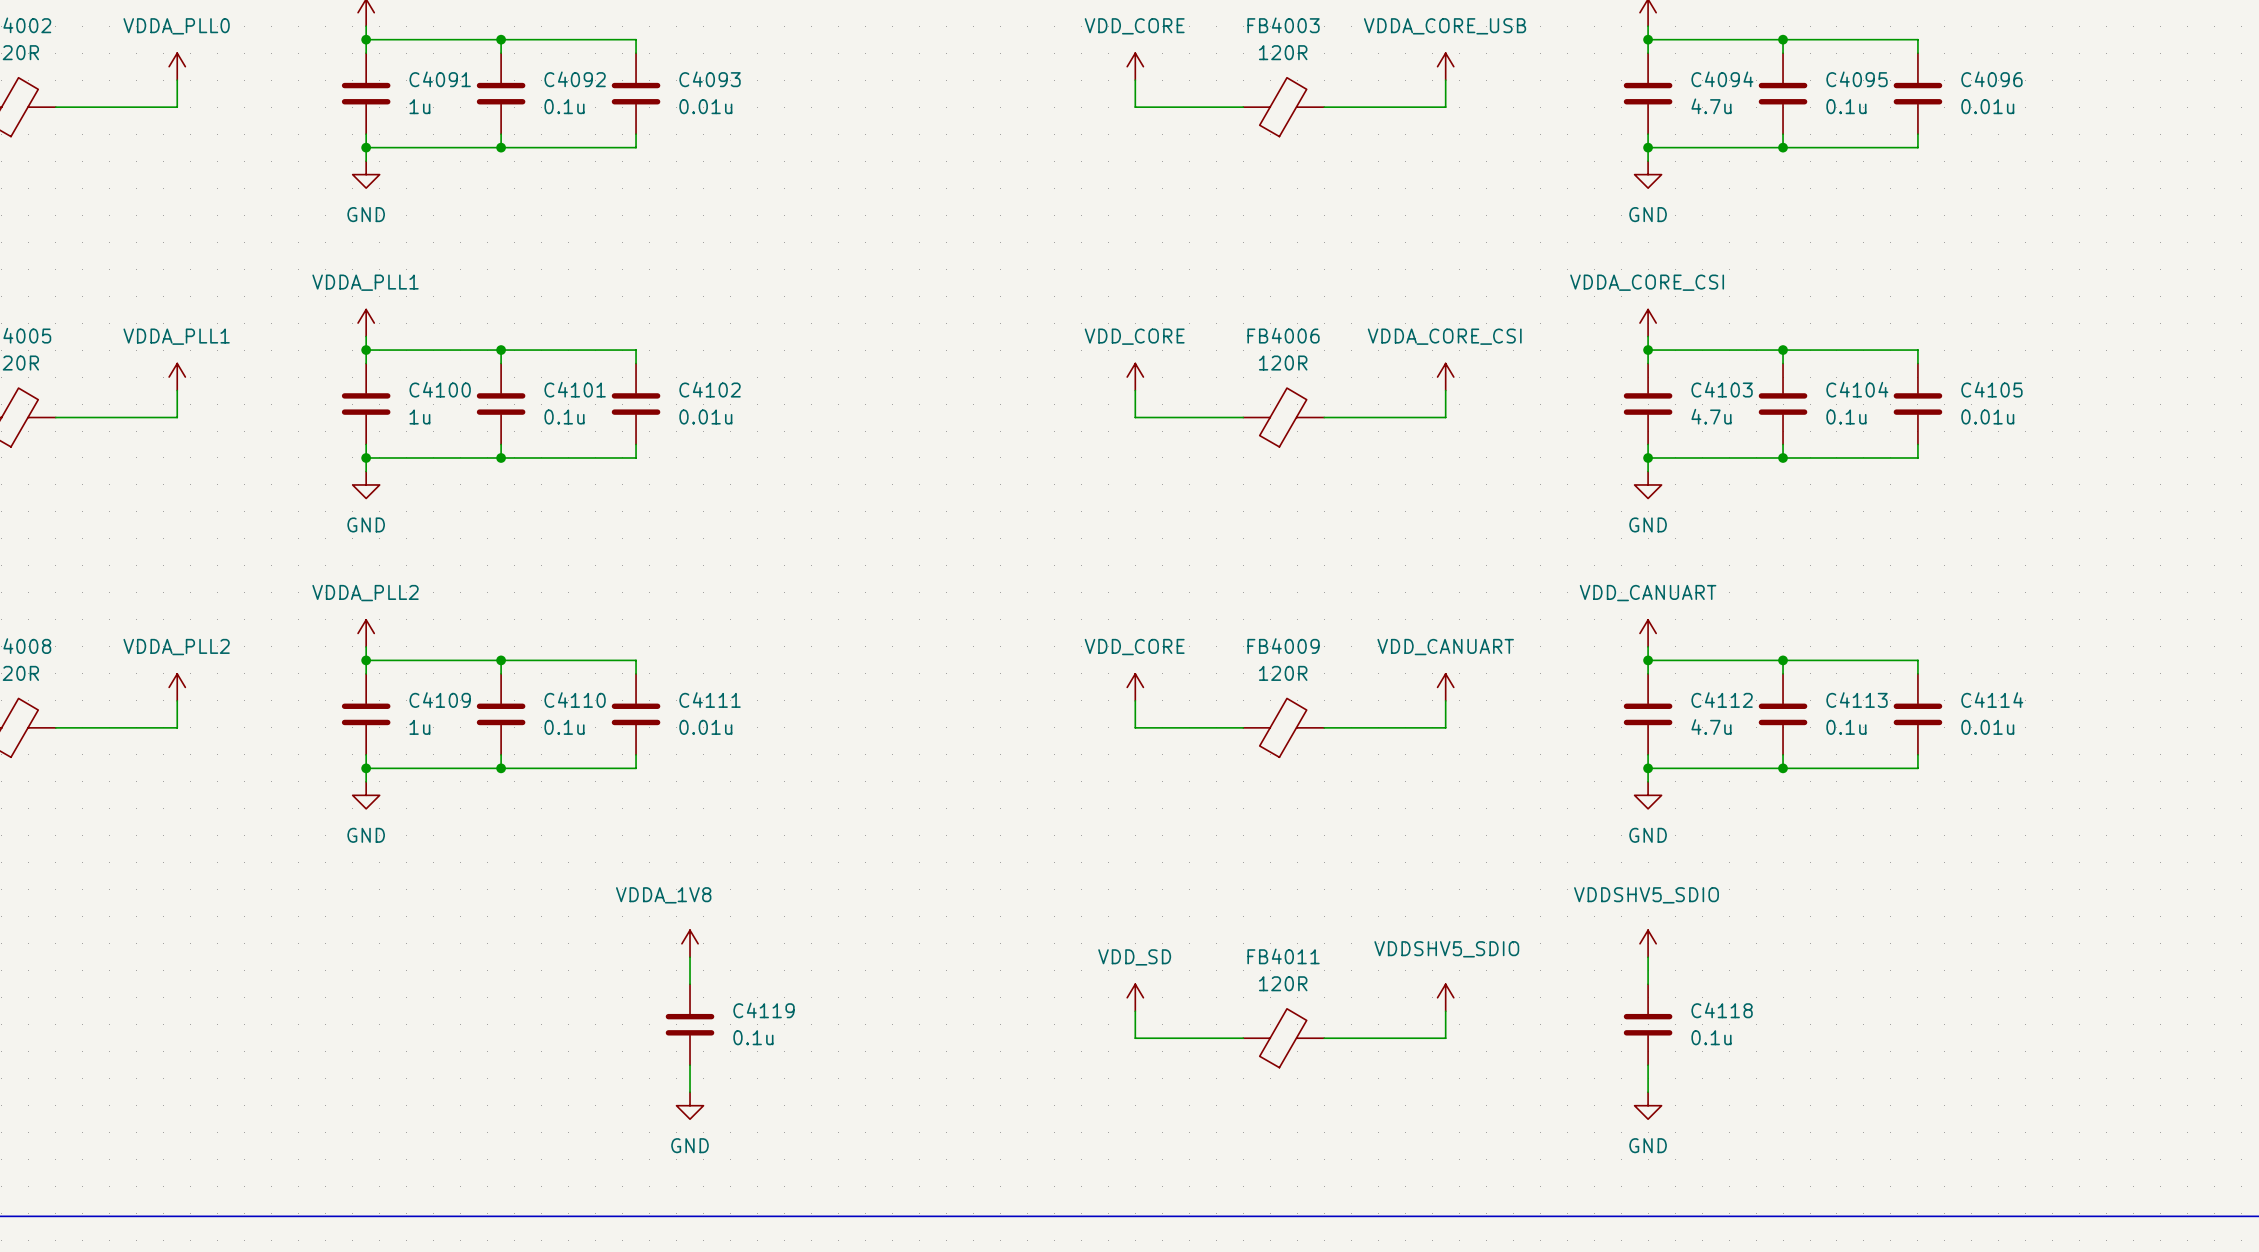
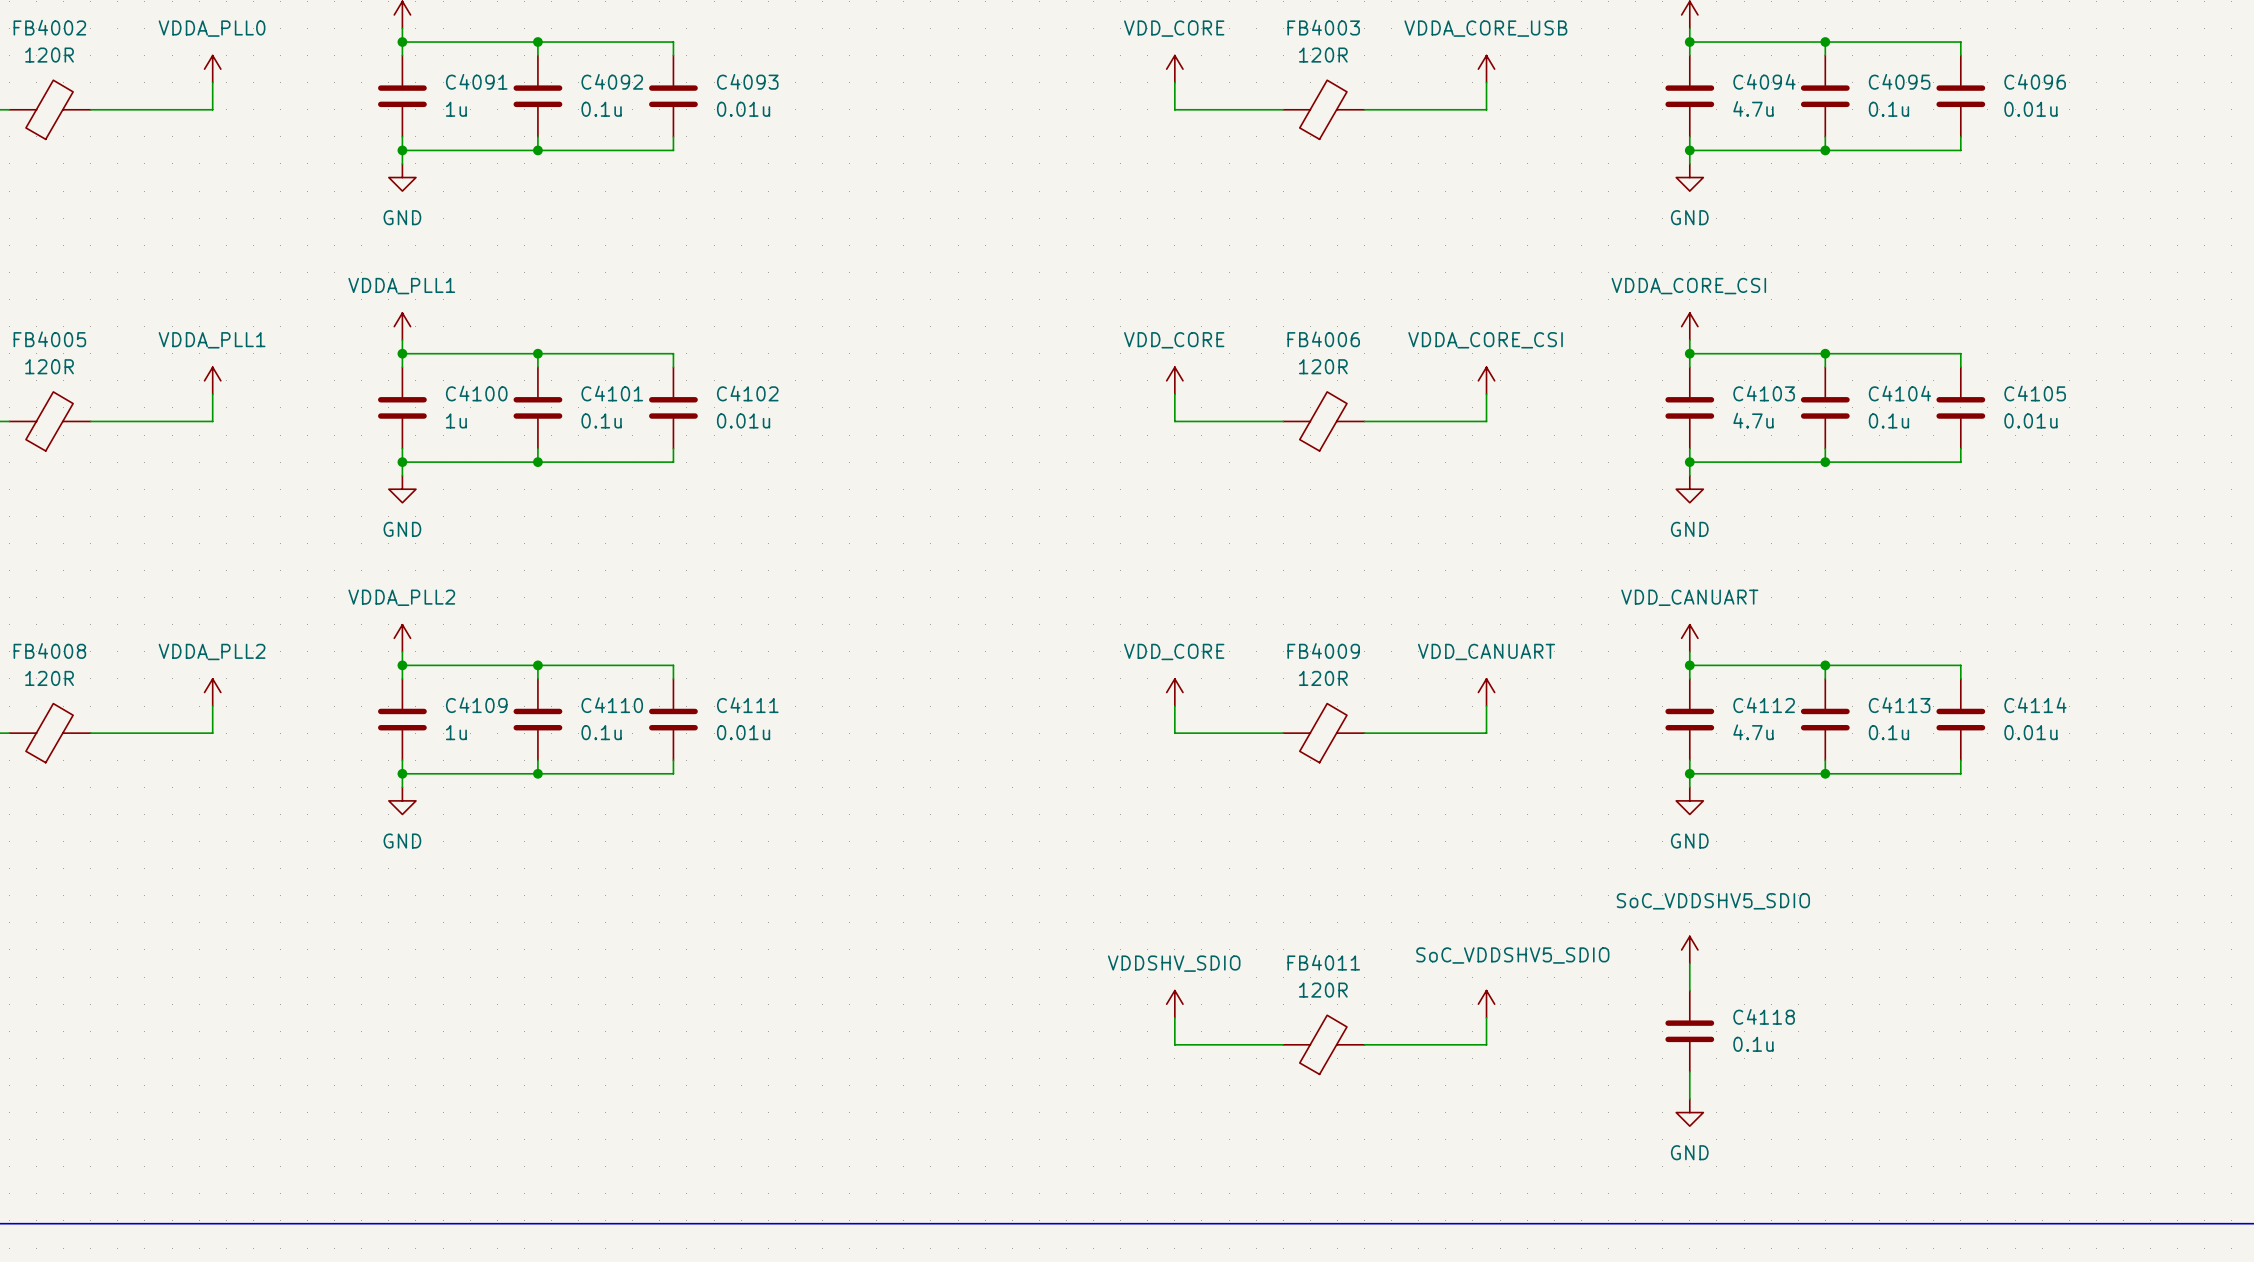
power symbol: VDDA_1V8 (690, 943) -> none
power symbol: VDDSHV5_SDIO (1648, 943) -> SoC_VDDSHV5_SDIO (1689, 949)
wire: (690, 957) (690, 984) -> none
power symbol: VDD_SD (1135, 997) -> VDDSHV_SDIO (1174, 1004)
power symbol: VDDSHV5_SDIO (1445, 997) -> SoC_VDDSHV5_SDIO (1486, 1004)
C4119: 0.1u (690, 1024) -> none
wire: (690, 1065) (690, 1092) -> none
power symbol: GND (690, 1105) -> none

